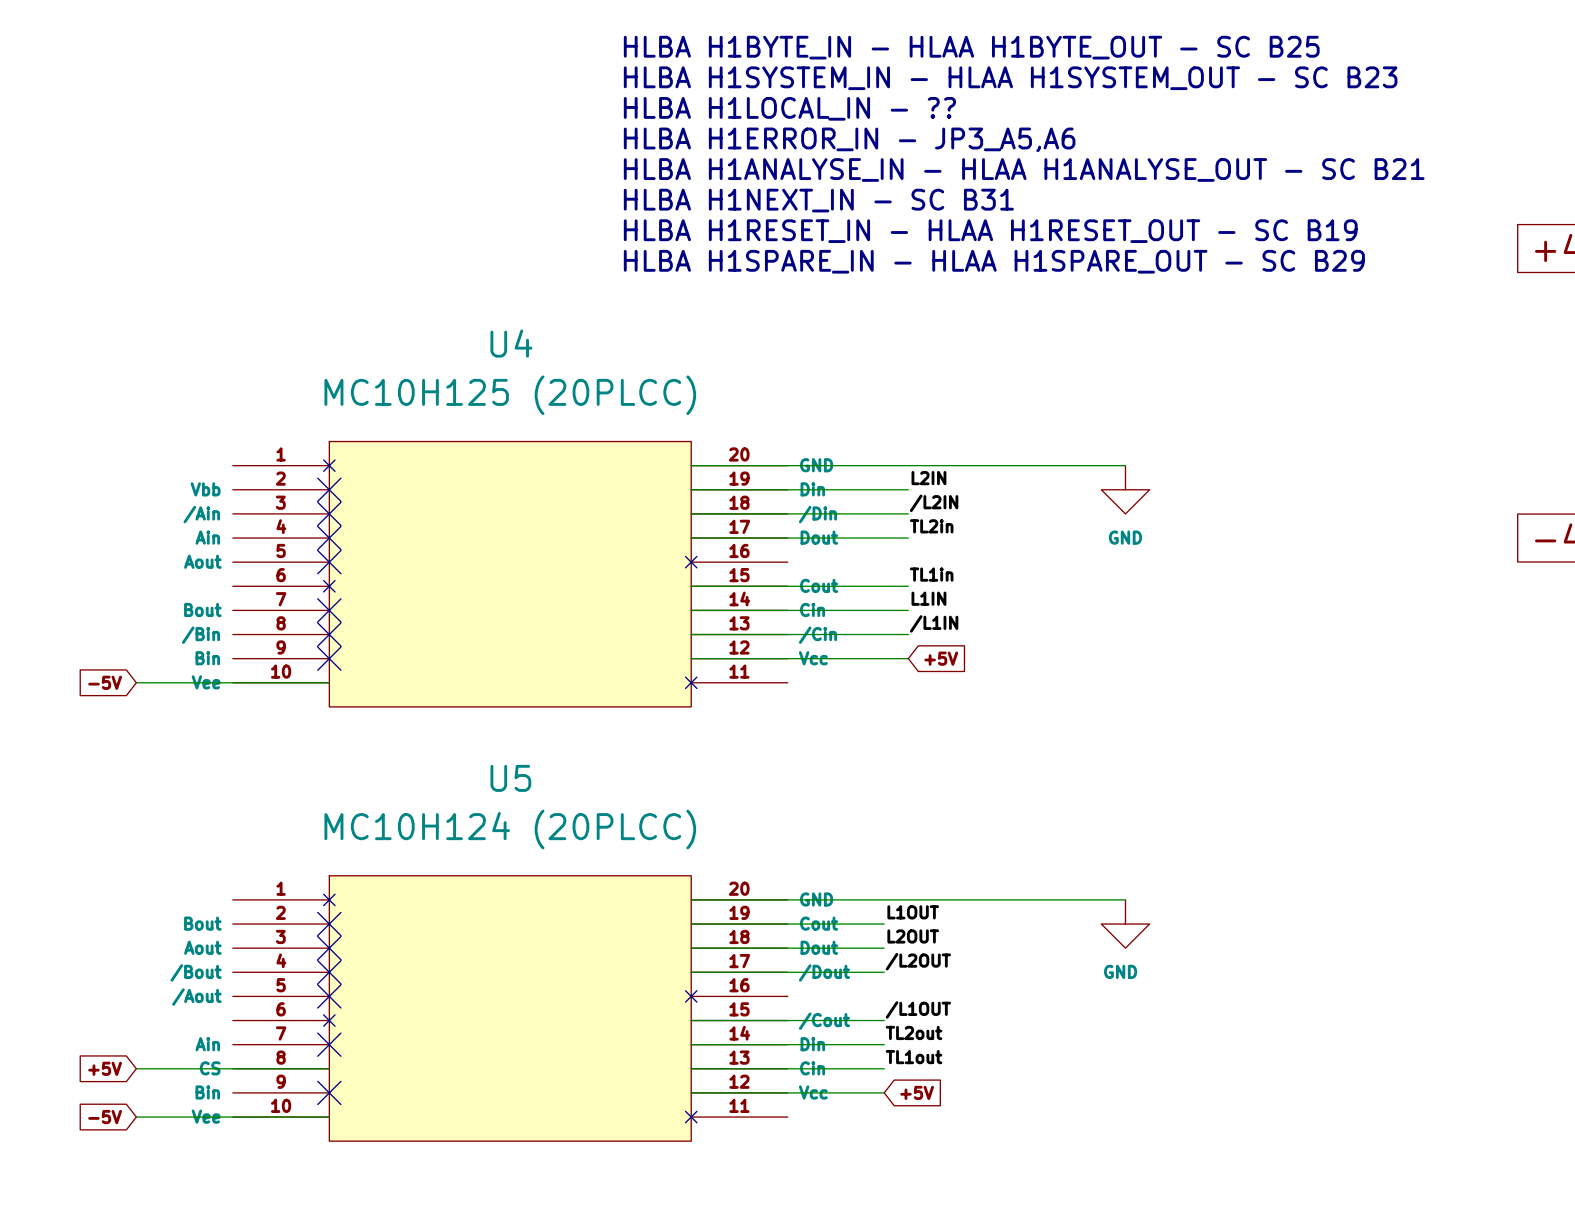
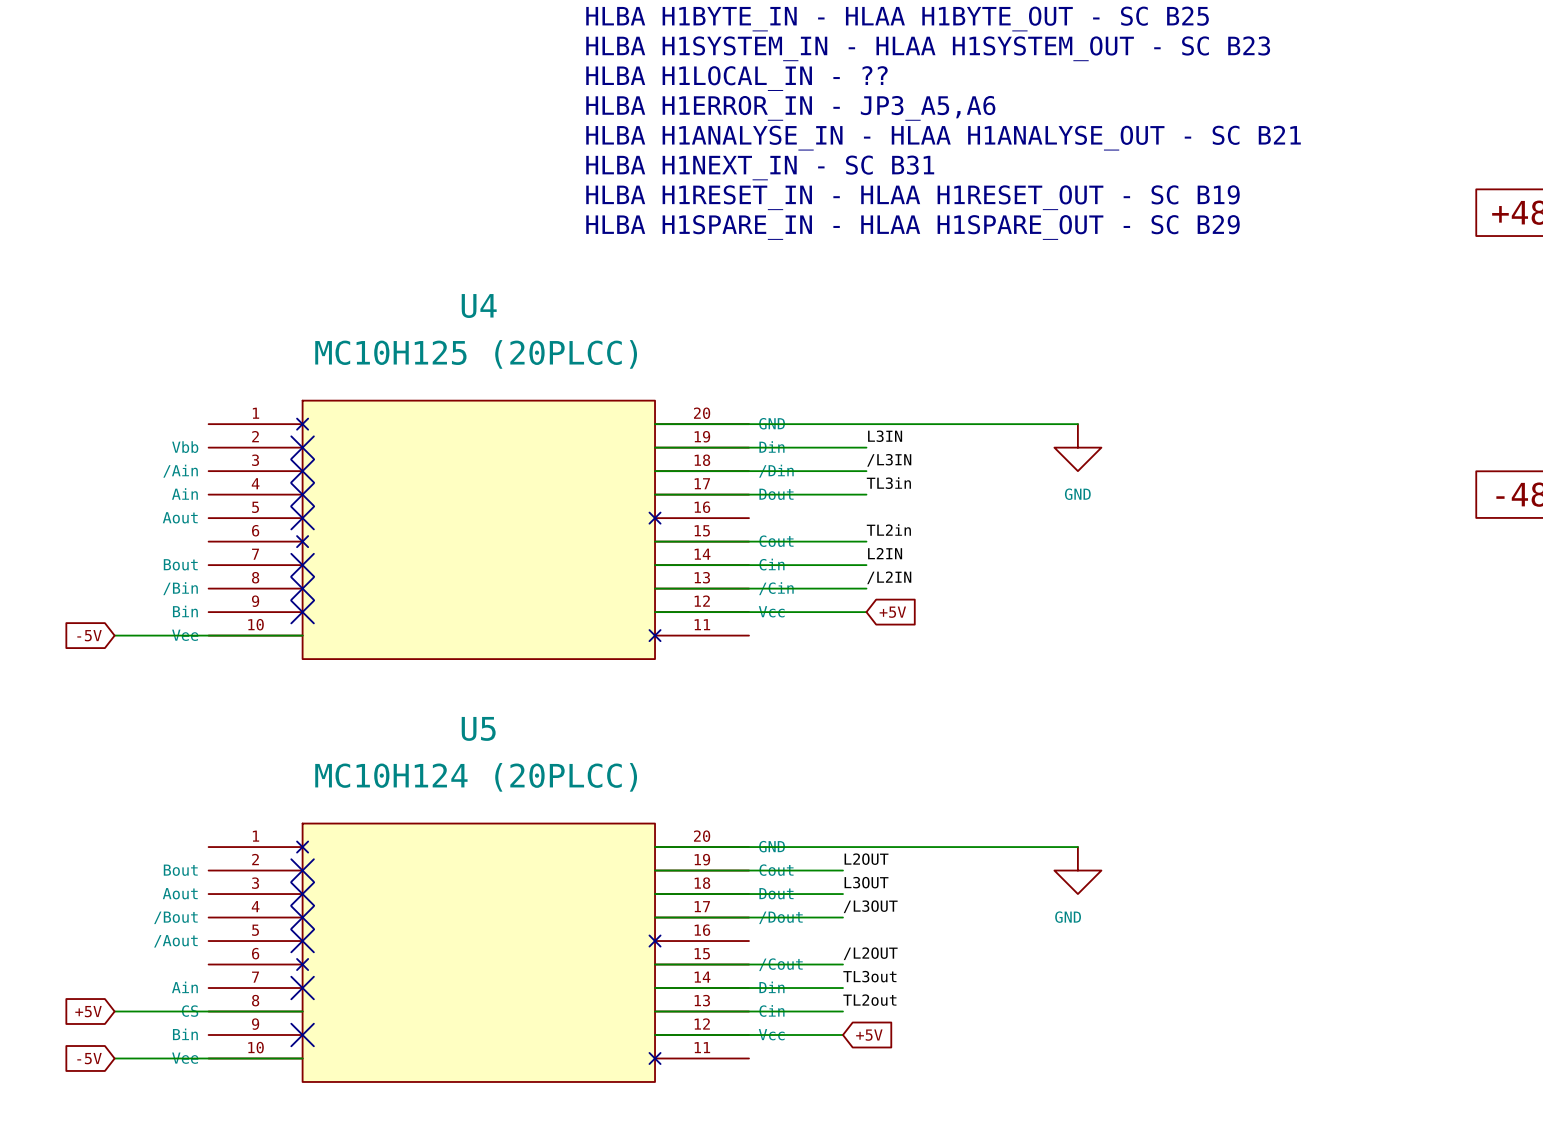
label: L2IN (928, 478) -> L3IN (885, 436)
label: /L2IN (934, 503) -> /L3IN (889, 460)
label: TL2in (931, 526) -> TL3in (888, 483)
label: TL1in (931, 574) -> TL2in (888, 529)
label: L1IN (928, 598) -> L2IN (885, 553)
label: /L1IN (934, 623) -> /L2IN (889, 577)
label: L1OUT (913, 912) -> L2OUT (866, 859)
label: L2OUT (913, 936) -> L3OUT (866, 882)
label: /L2OUT (918, 961) -> /L3OUT (870, 906)
label: /L1OUT (918, 1009) -> /L2OUT (870, 953)
label: TL2out (914, 1032) -> TL3out (869, 976)
label: TL1out (914, 1057) -> TL2out (869, 1000)

